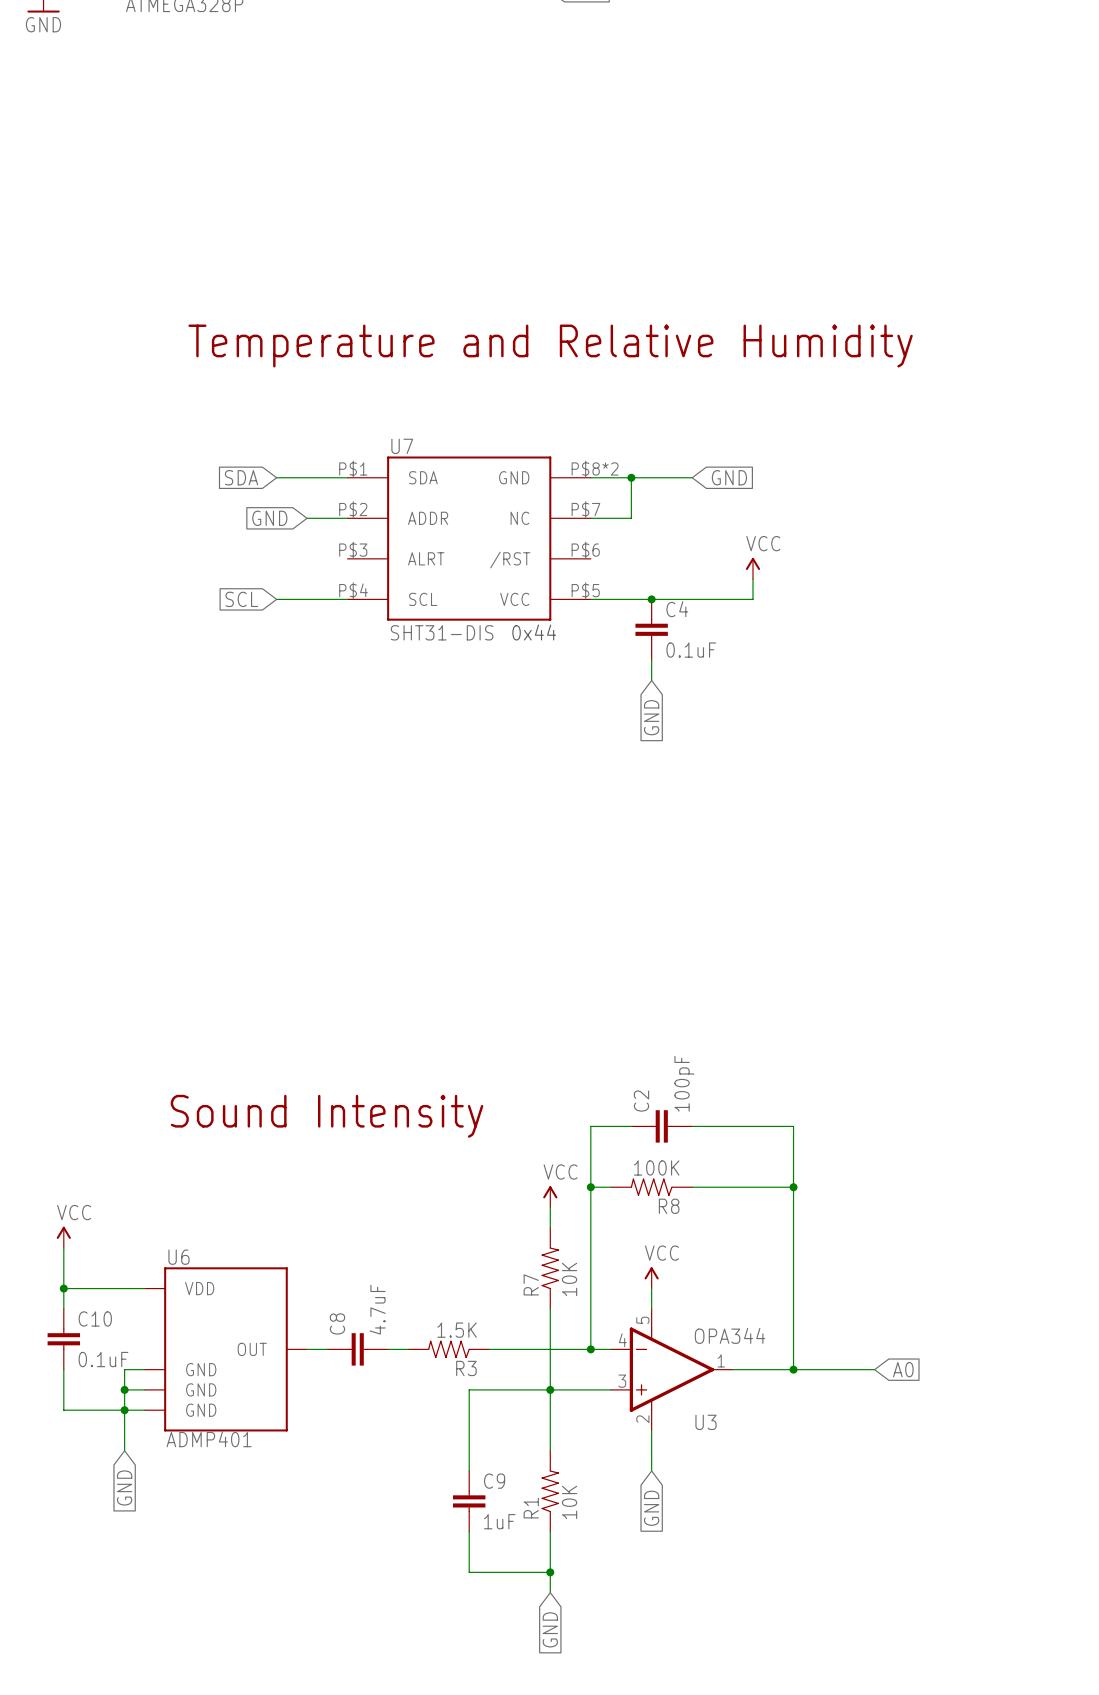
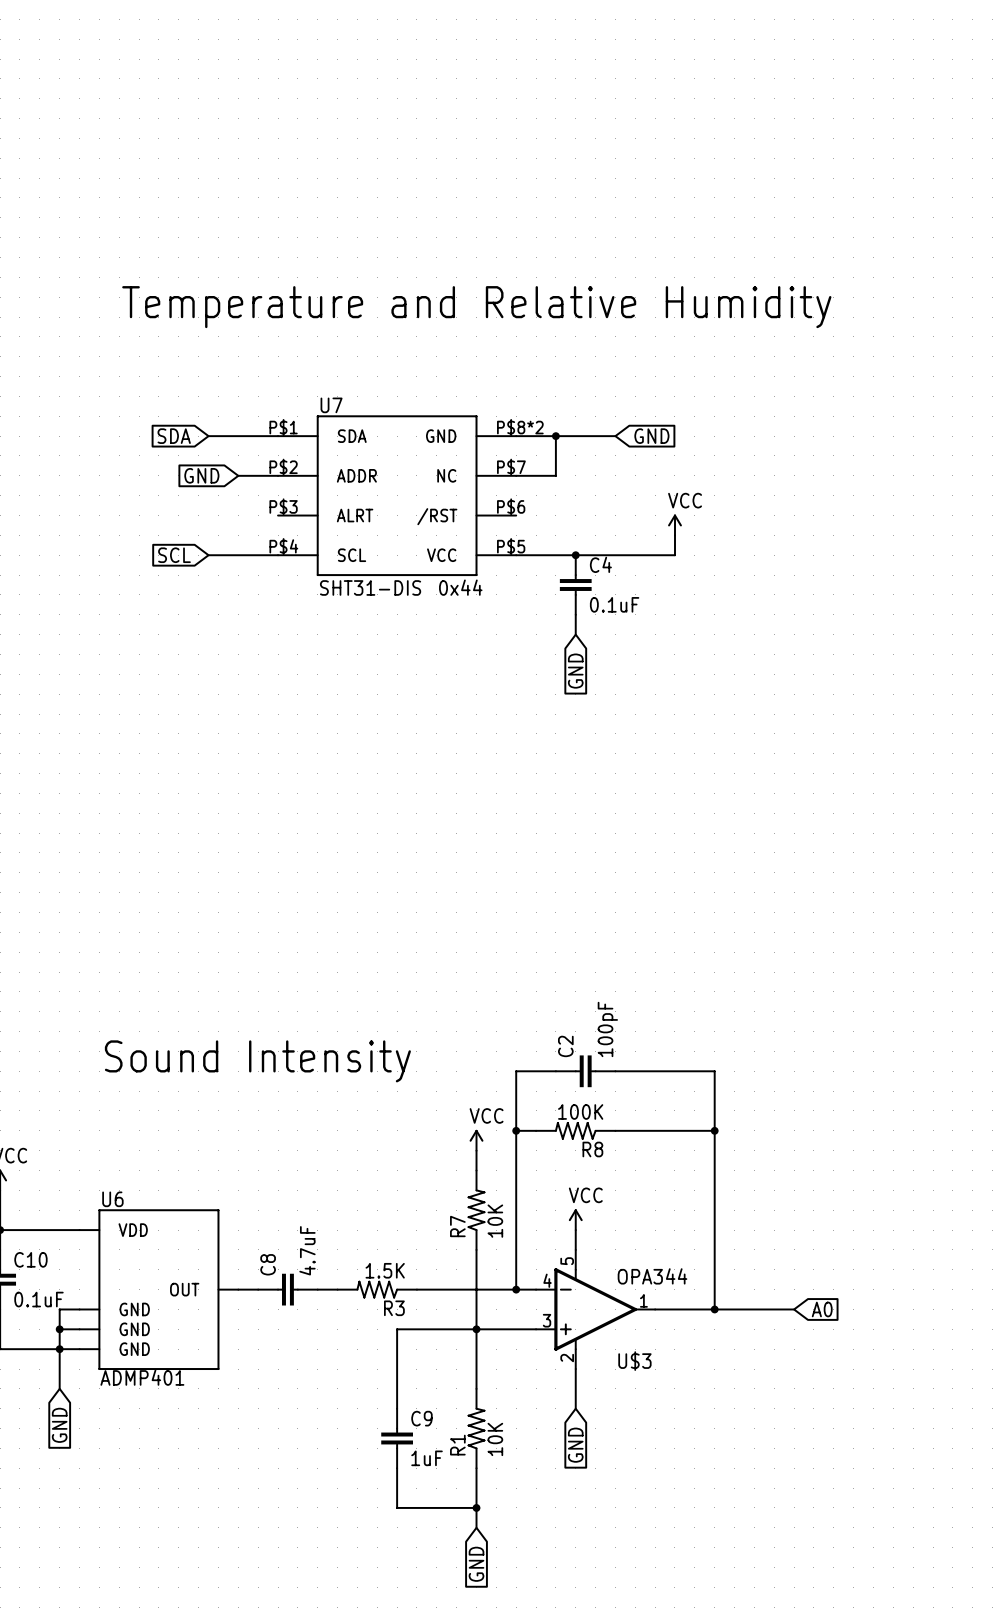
U3 name: U3 (706, 1422) -> U$3 (634, 1361)

